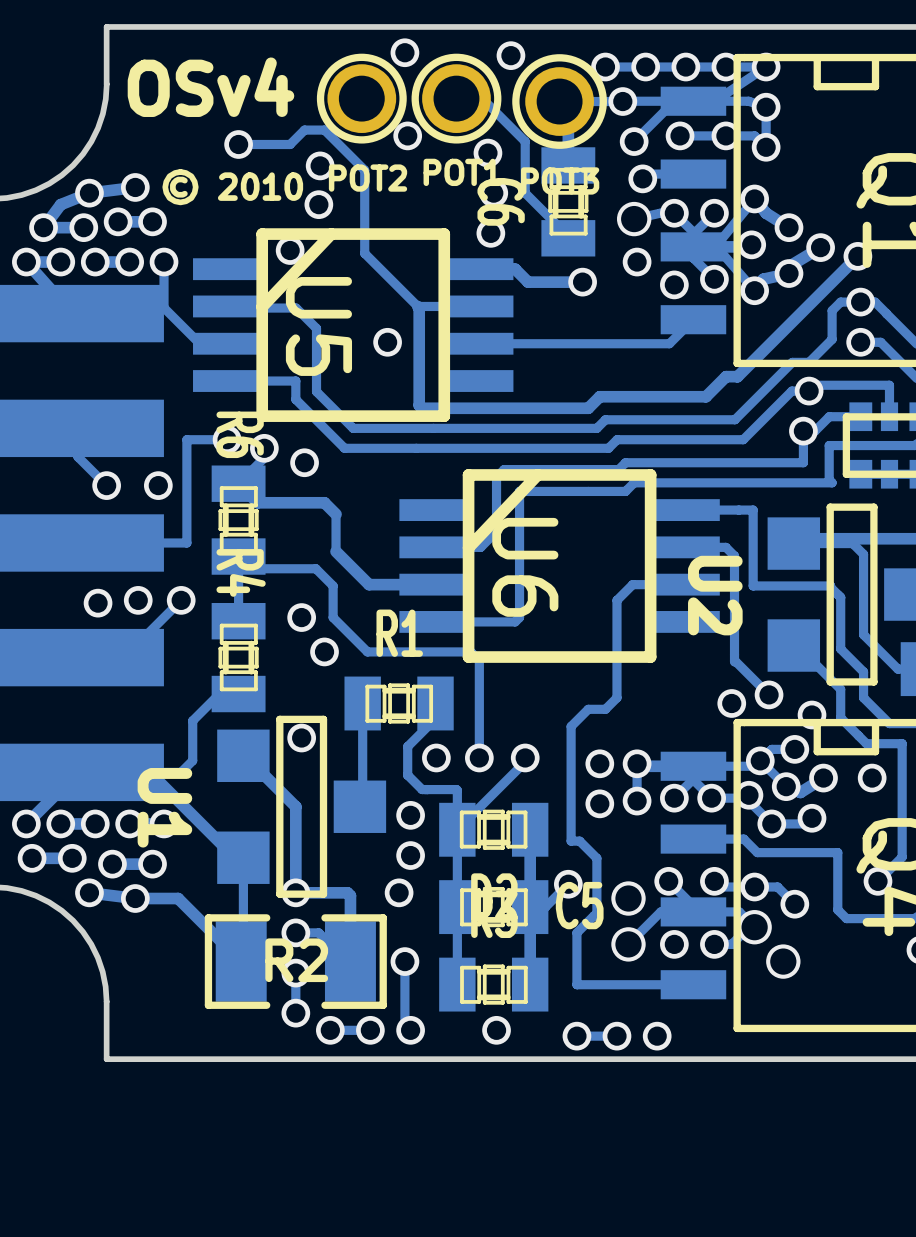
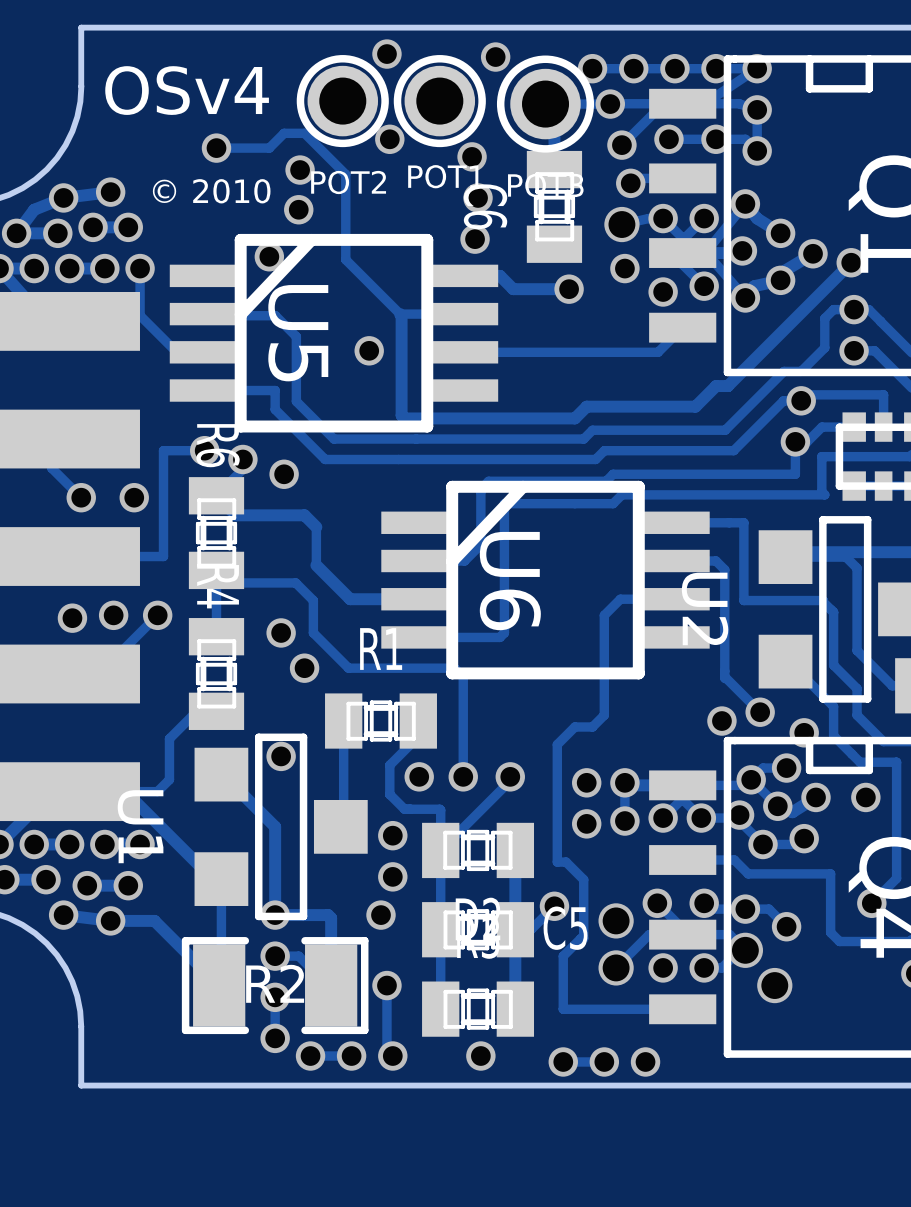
track: (456, 98) (482, 98) (525, 141) (525, 193) (568, 238) -> none

